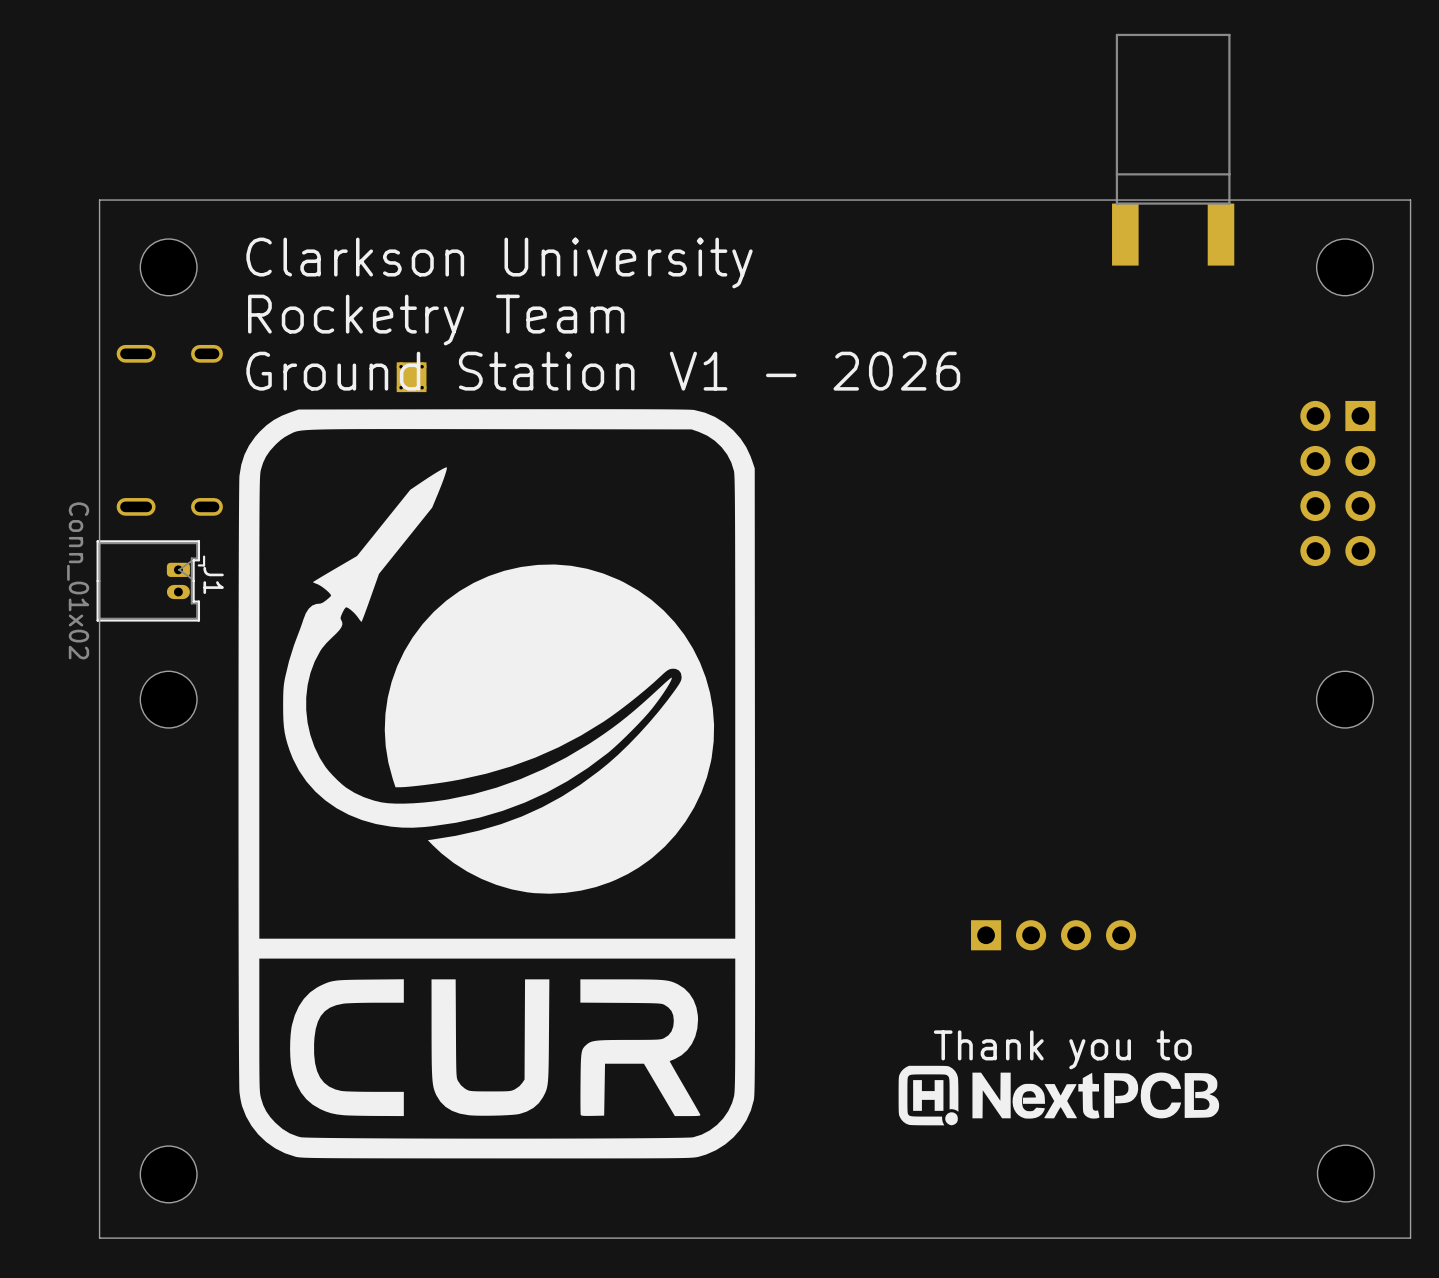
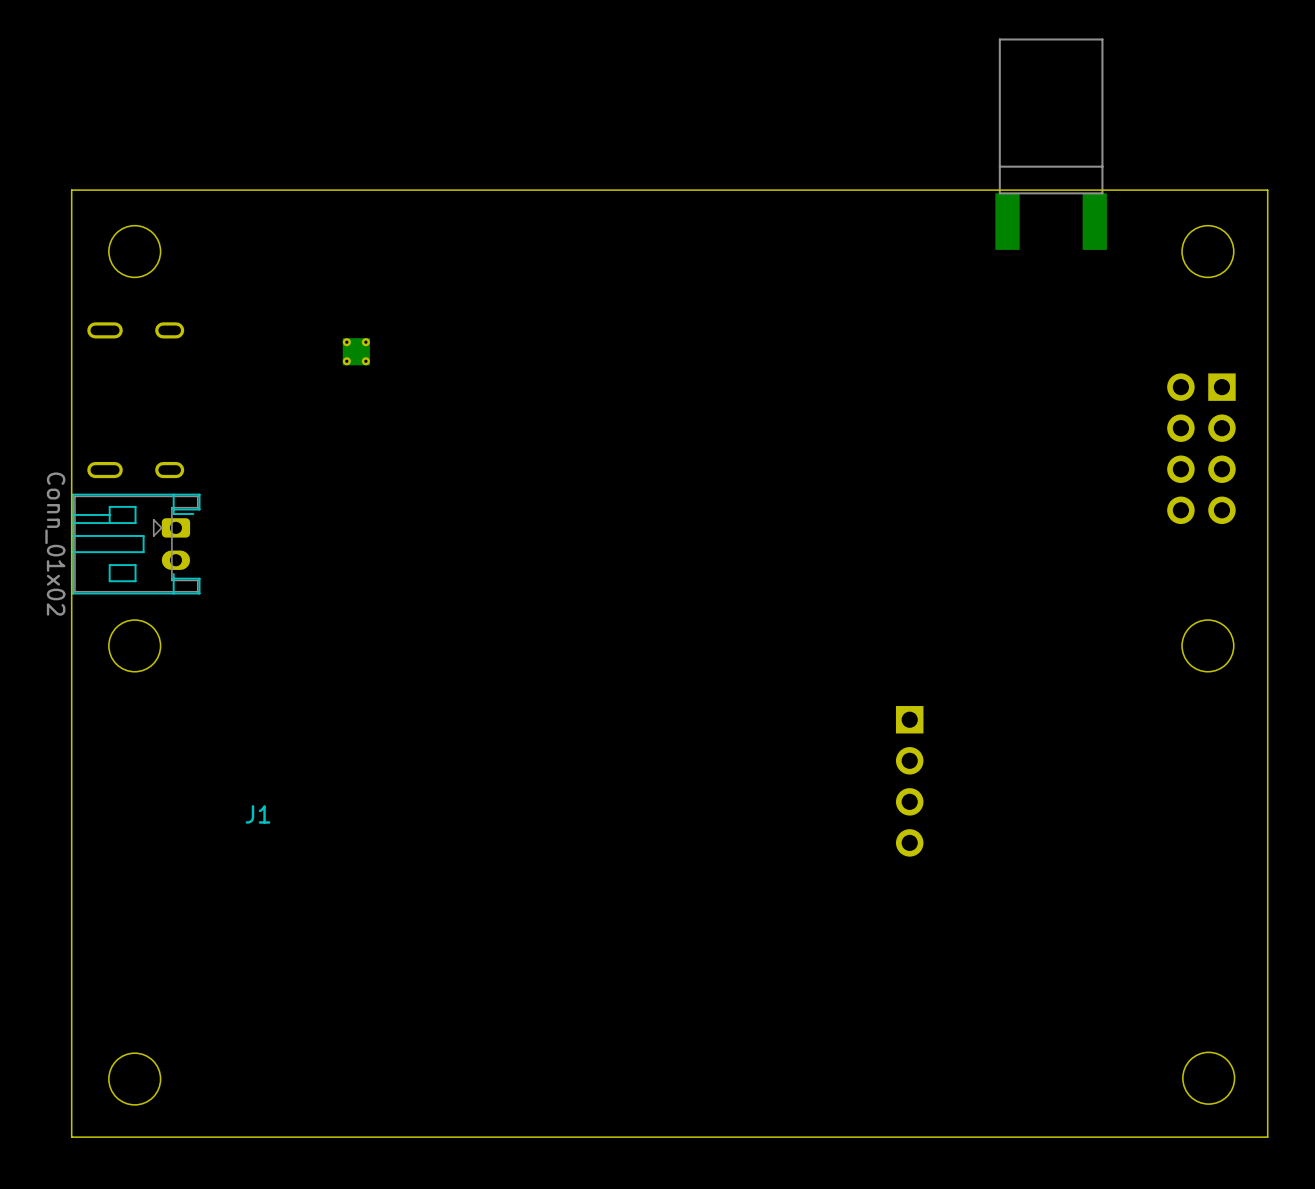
text: Clarkson University (499, 262) -> none
text: Rocketry Team (436, 320) -> none
text: Ground Station V1 - 2026 (603, 371) -> none
drawing: [238, 409, 756, 1159] -> none
J1 footprint: [96, 540, 206, 622] -> [72, 493, 201, 595]
J1 name position: J1 (213, 580) -> J1 (257, 814)
part rotation: 0° (1053, 935) -> 90° clockwise (909, 781)
text: Thank you to (1062, 1049) -> none
drawing: [898, 1065, 1220, 1126] -> none

